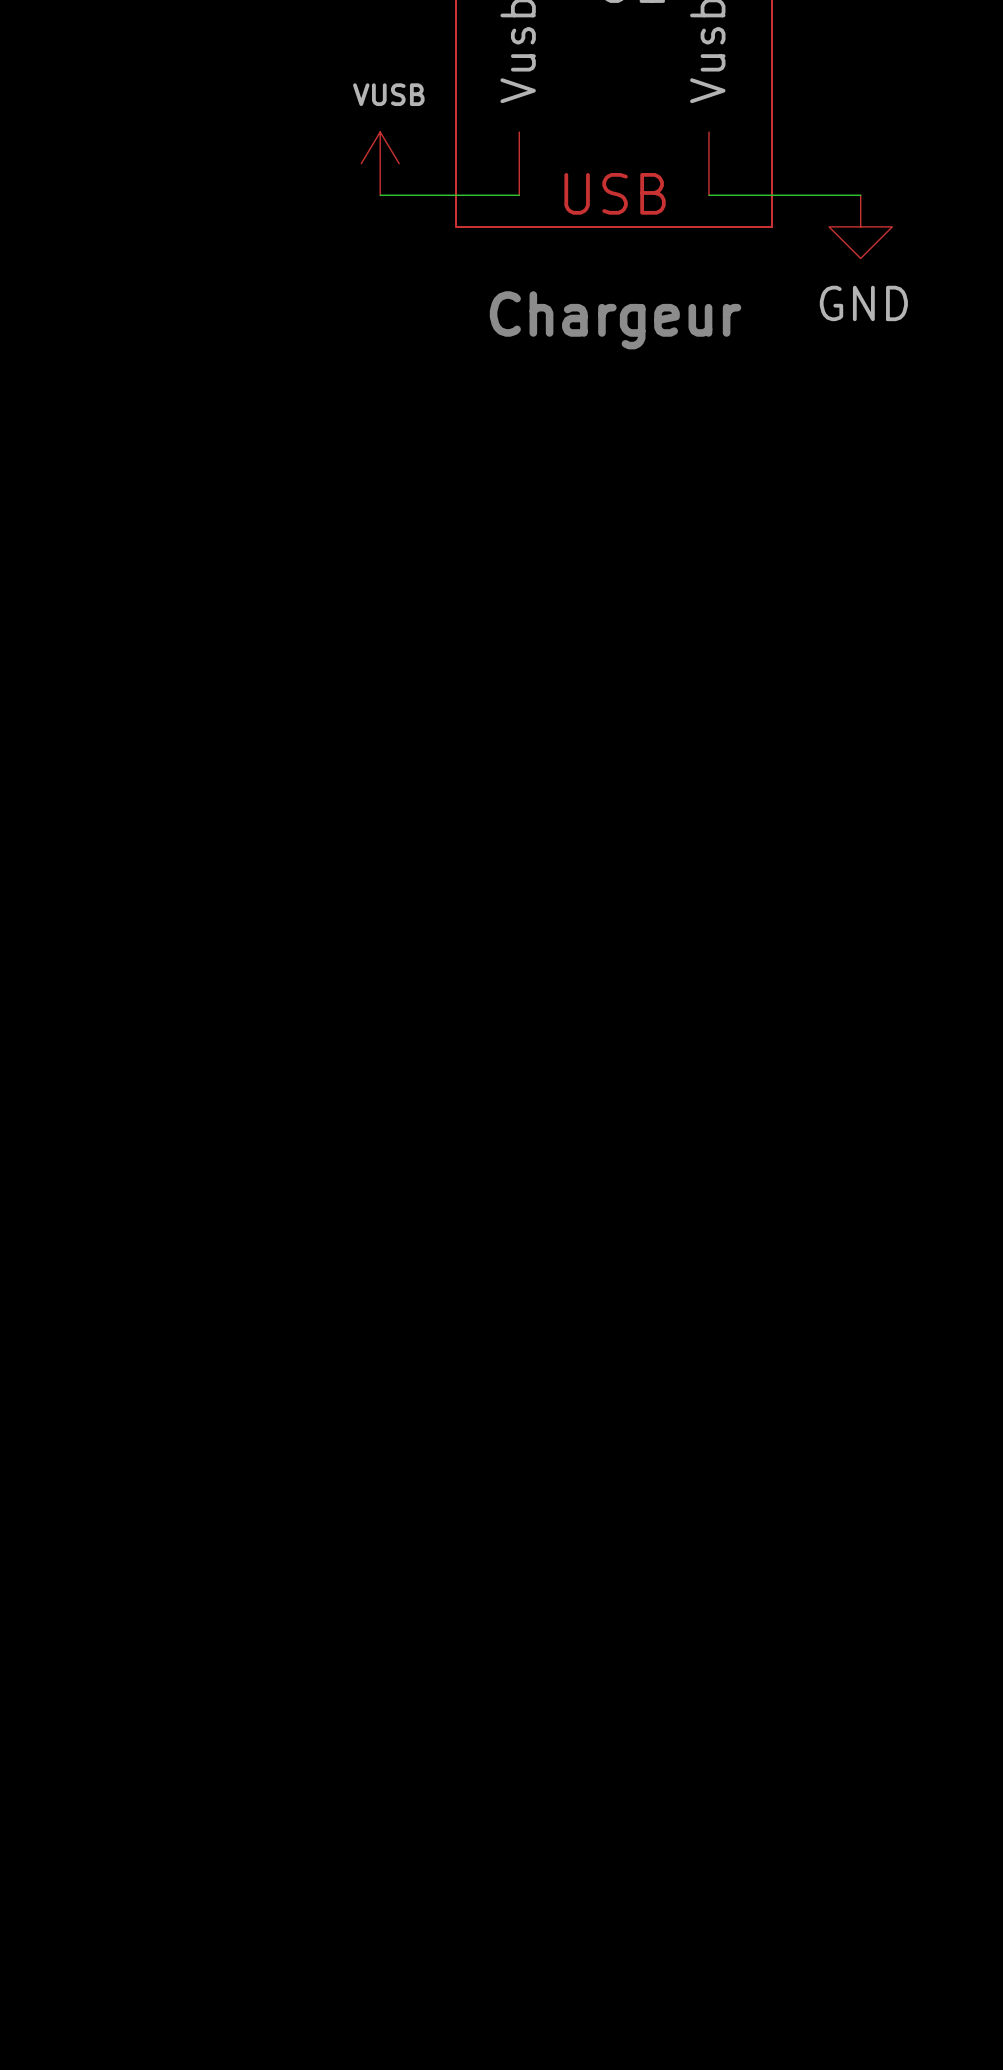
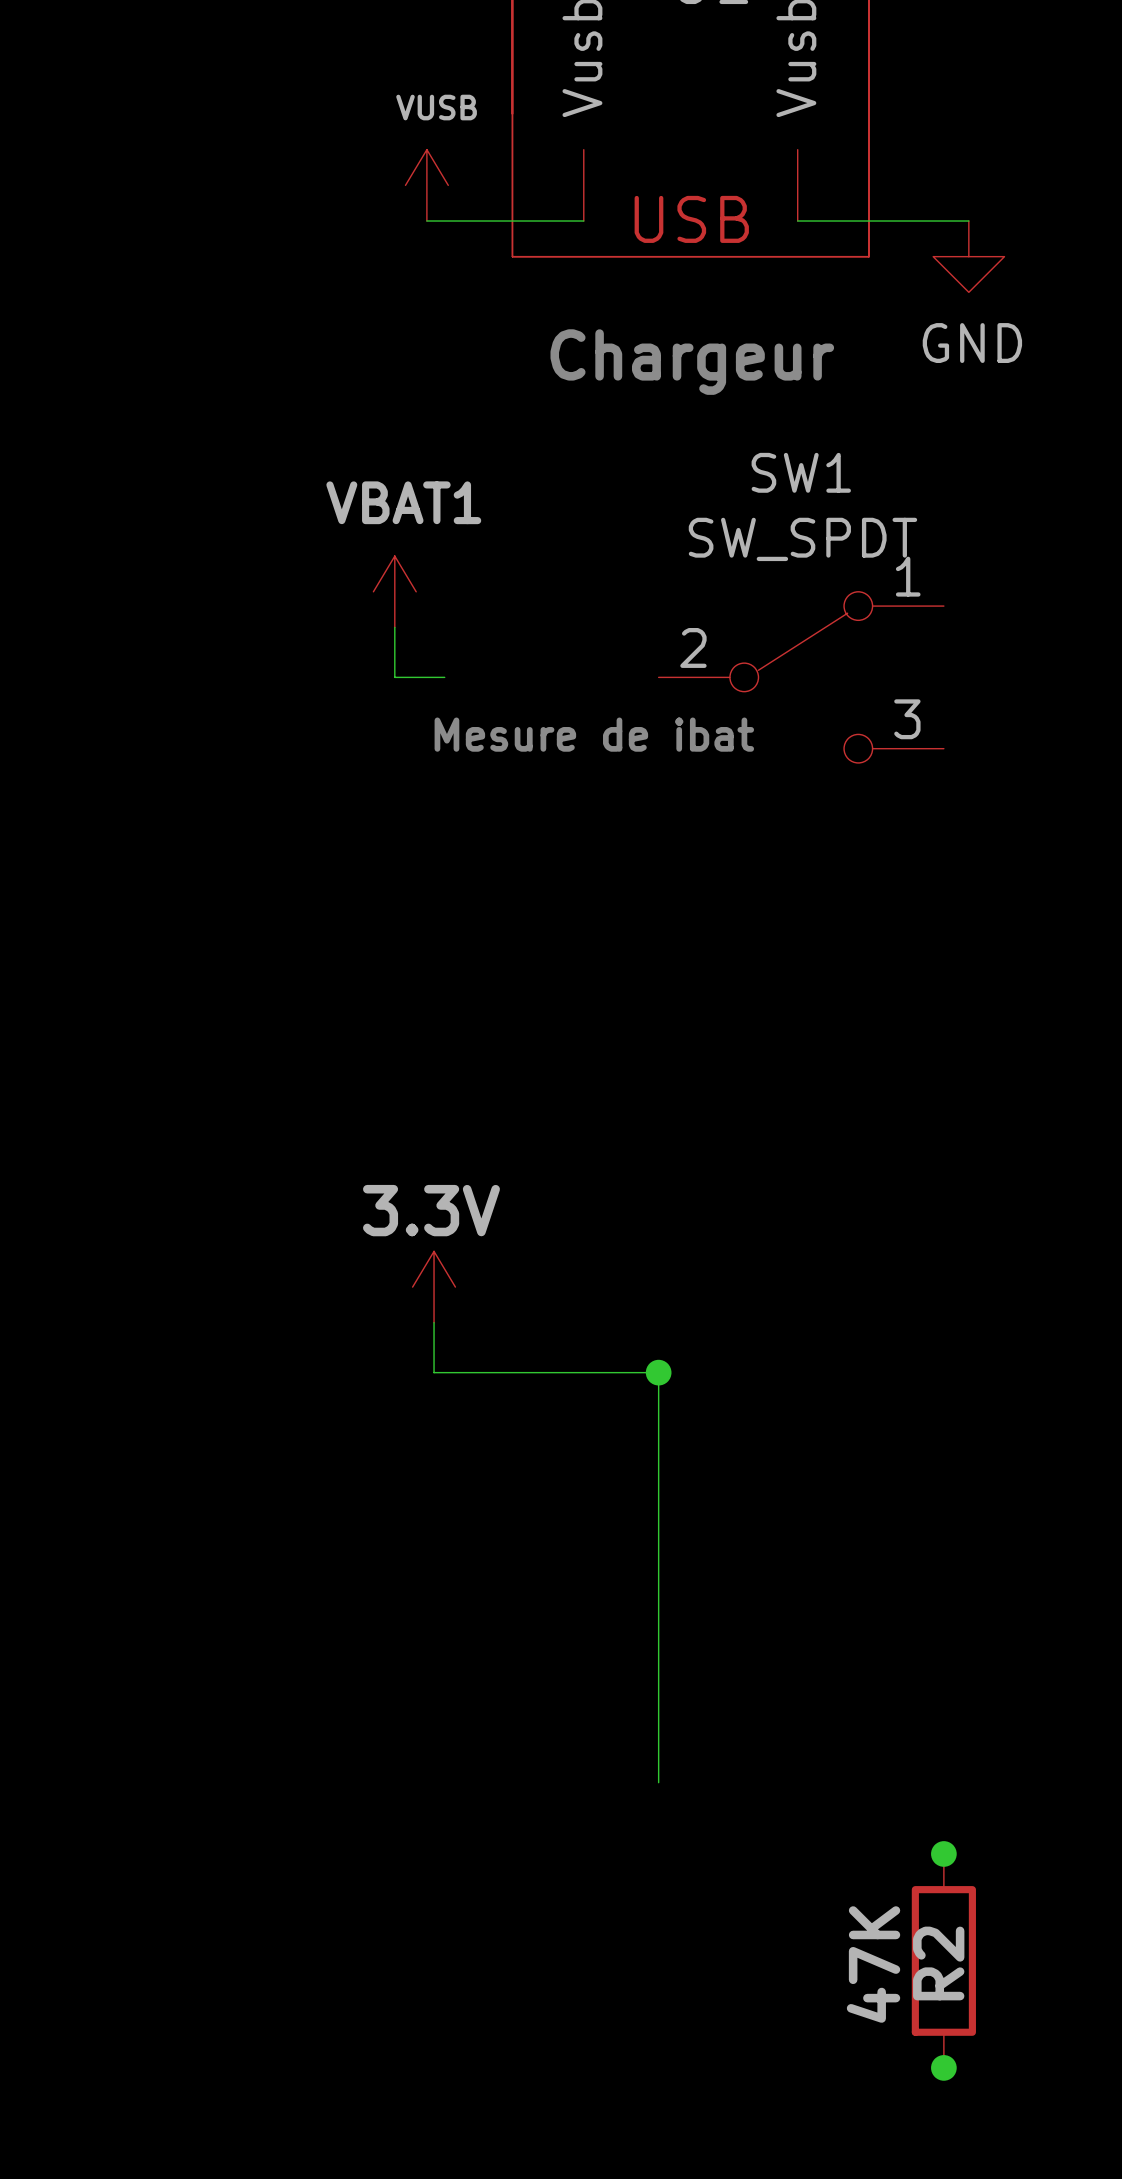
power symbol: none -> VBAT1 (394, 591)
wire: none -> (394, 627) (394, 677) (444, 677)
SW1: none -> SW_SPDT (801, 677)
text: none -> Mesure de ibat (594, 734)
power symbol: none -> 3.3V (434, 1287)
wire: none -> (434, 1322) (434, 1372) (658, 1372) (658, 1782)
junction: none -> (658, 1372)
junction: none -> (943, 1853)
R2: none -> 47K (943, 1960)
junction: none -> (943, 2067)

